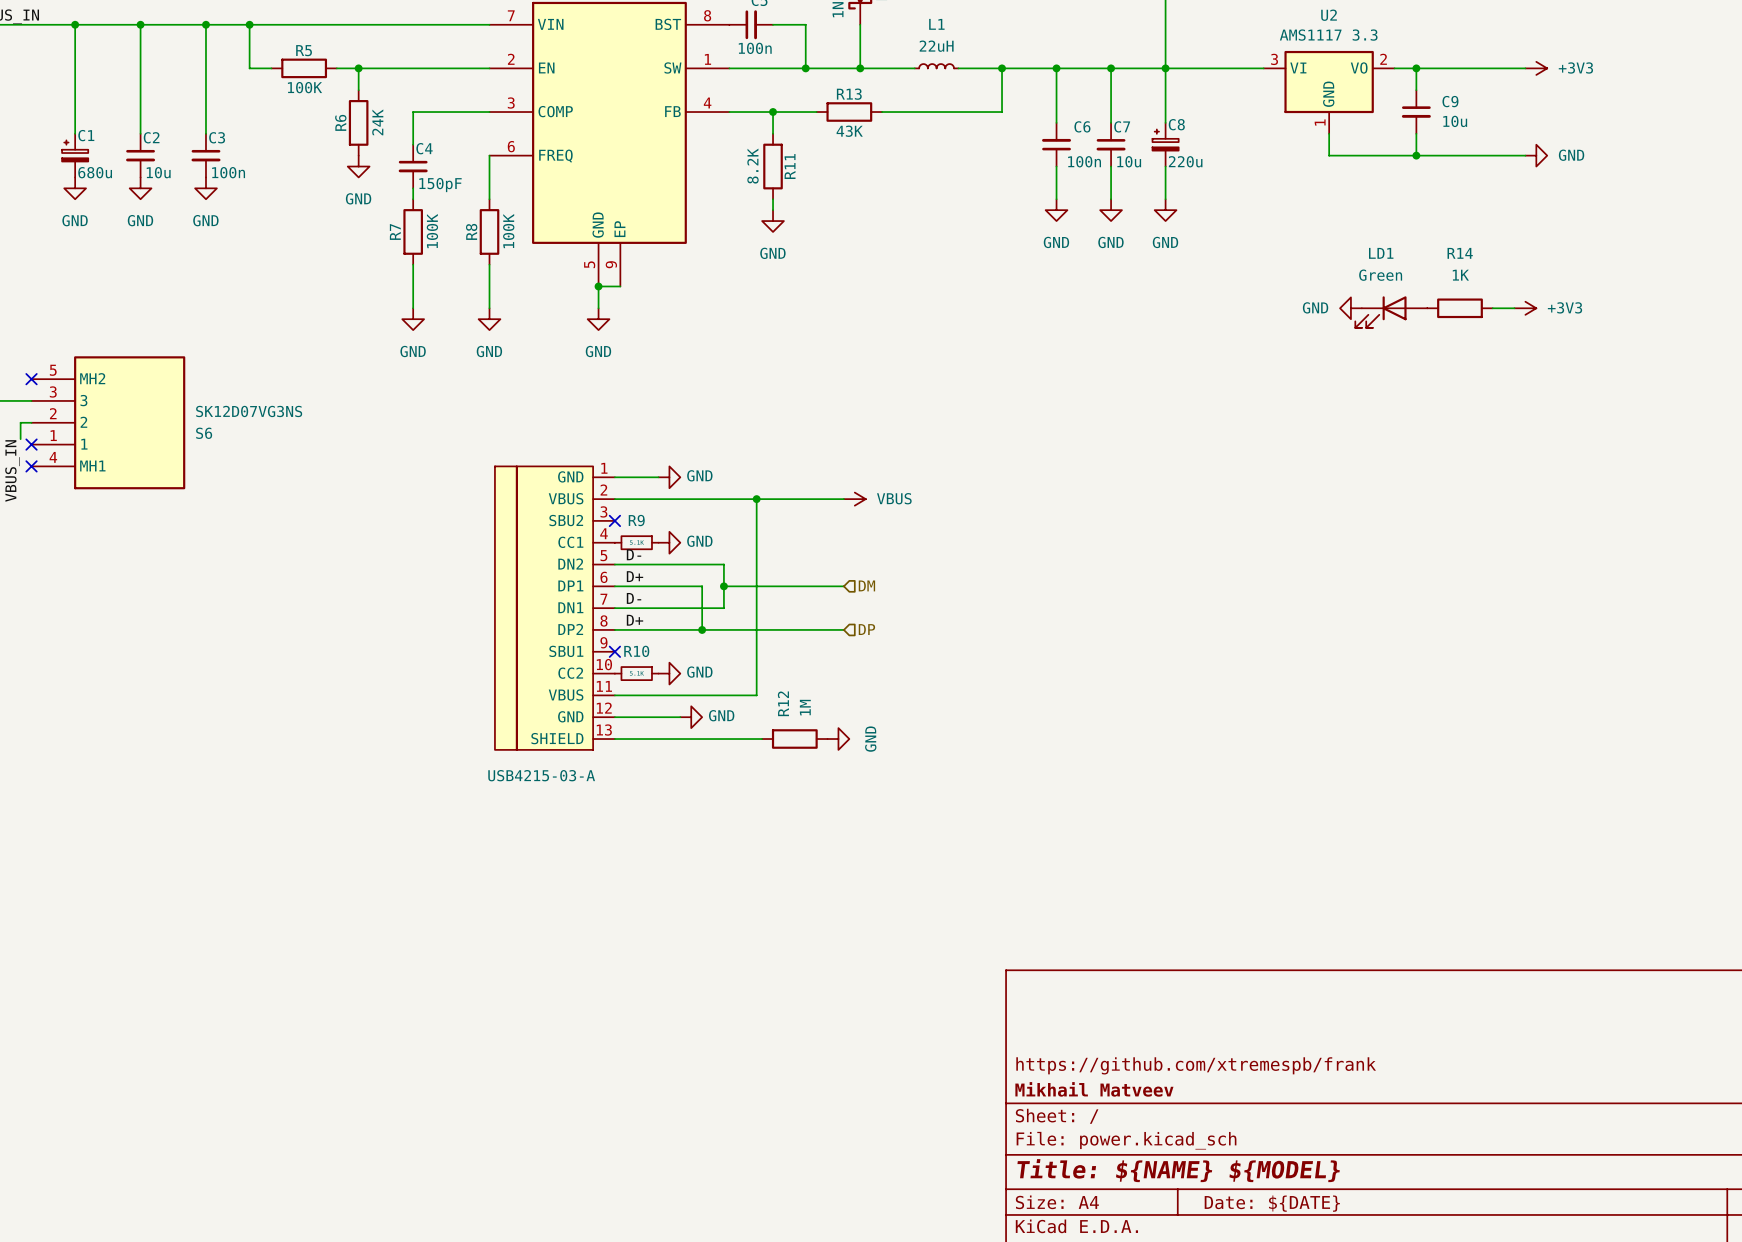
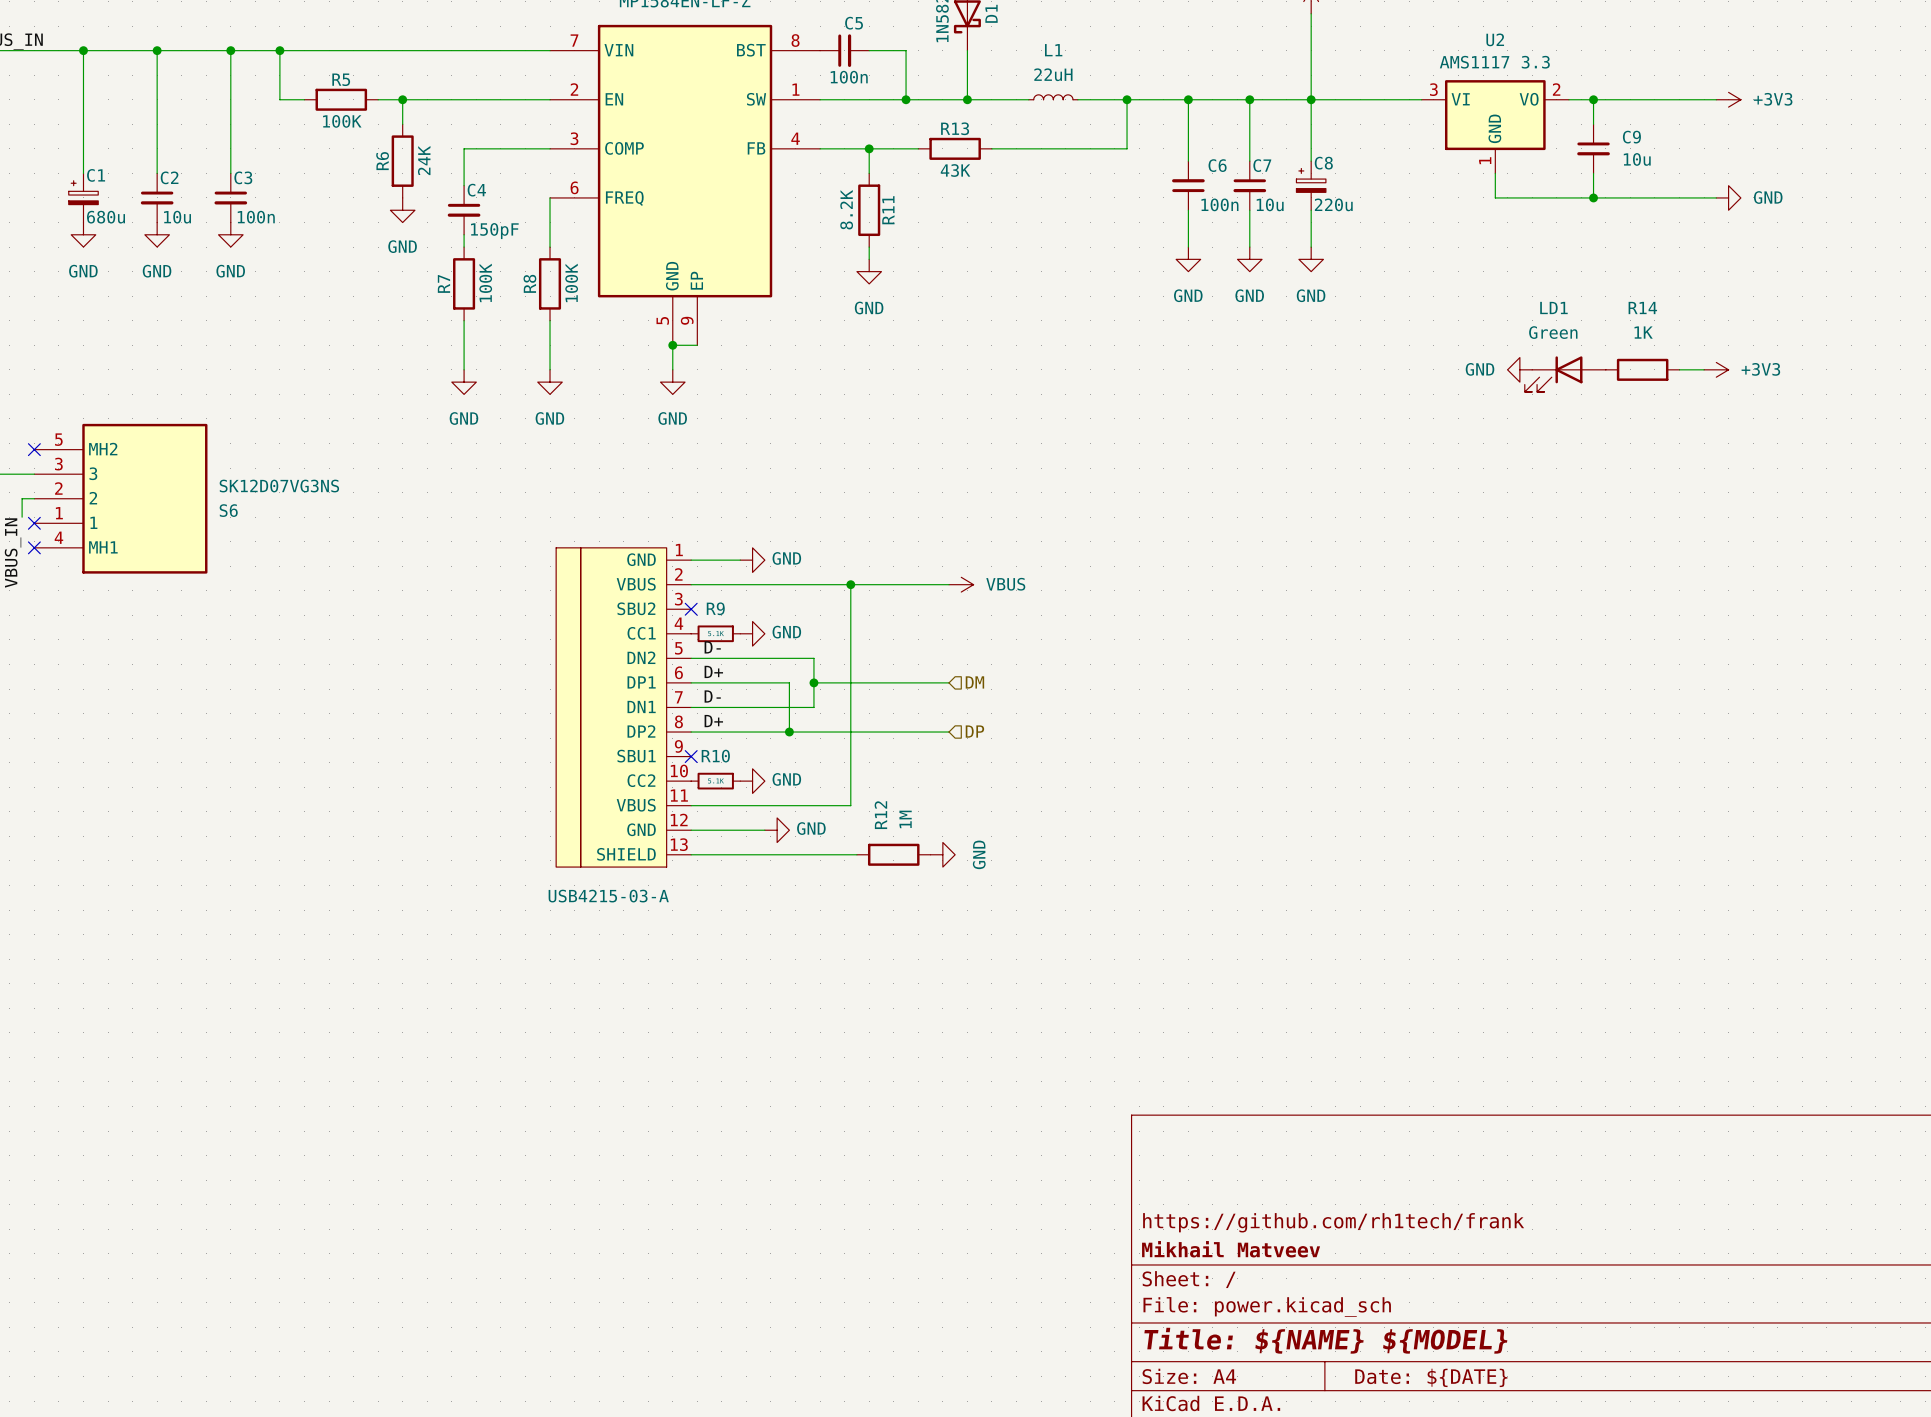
title block: https://github.com/xtremespb/frank (1196, 1065) -> https://github.com/rh1tech/frank (1333, 1222)

